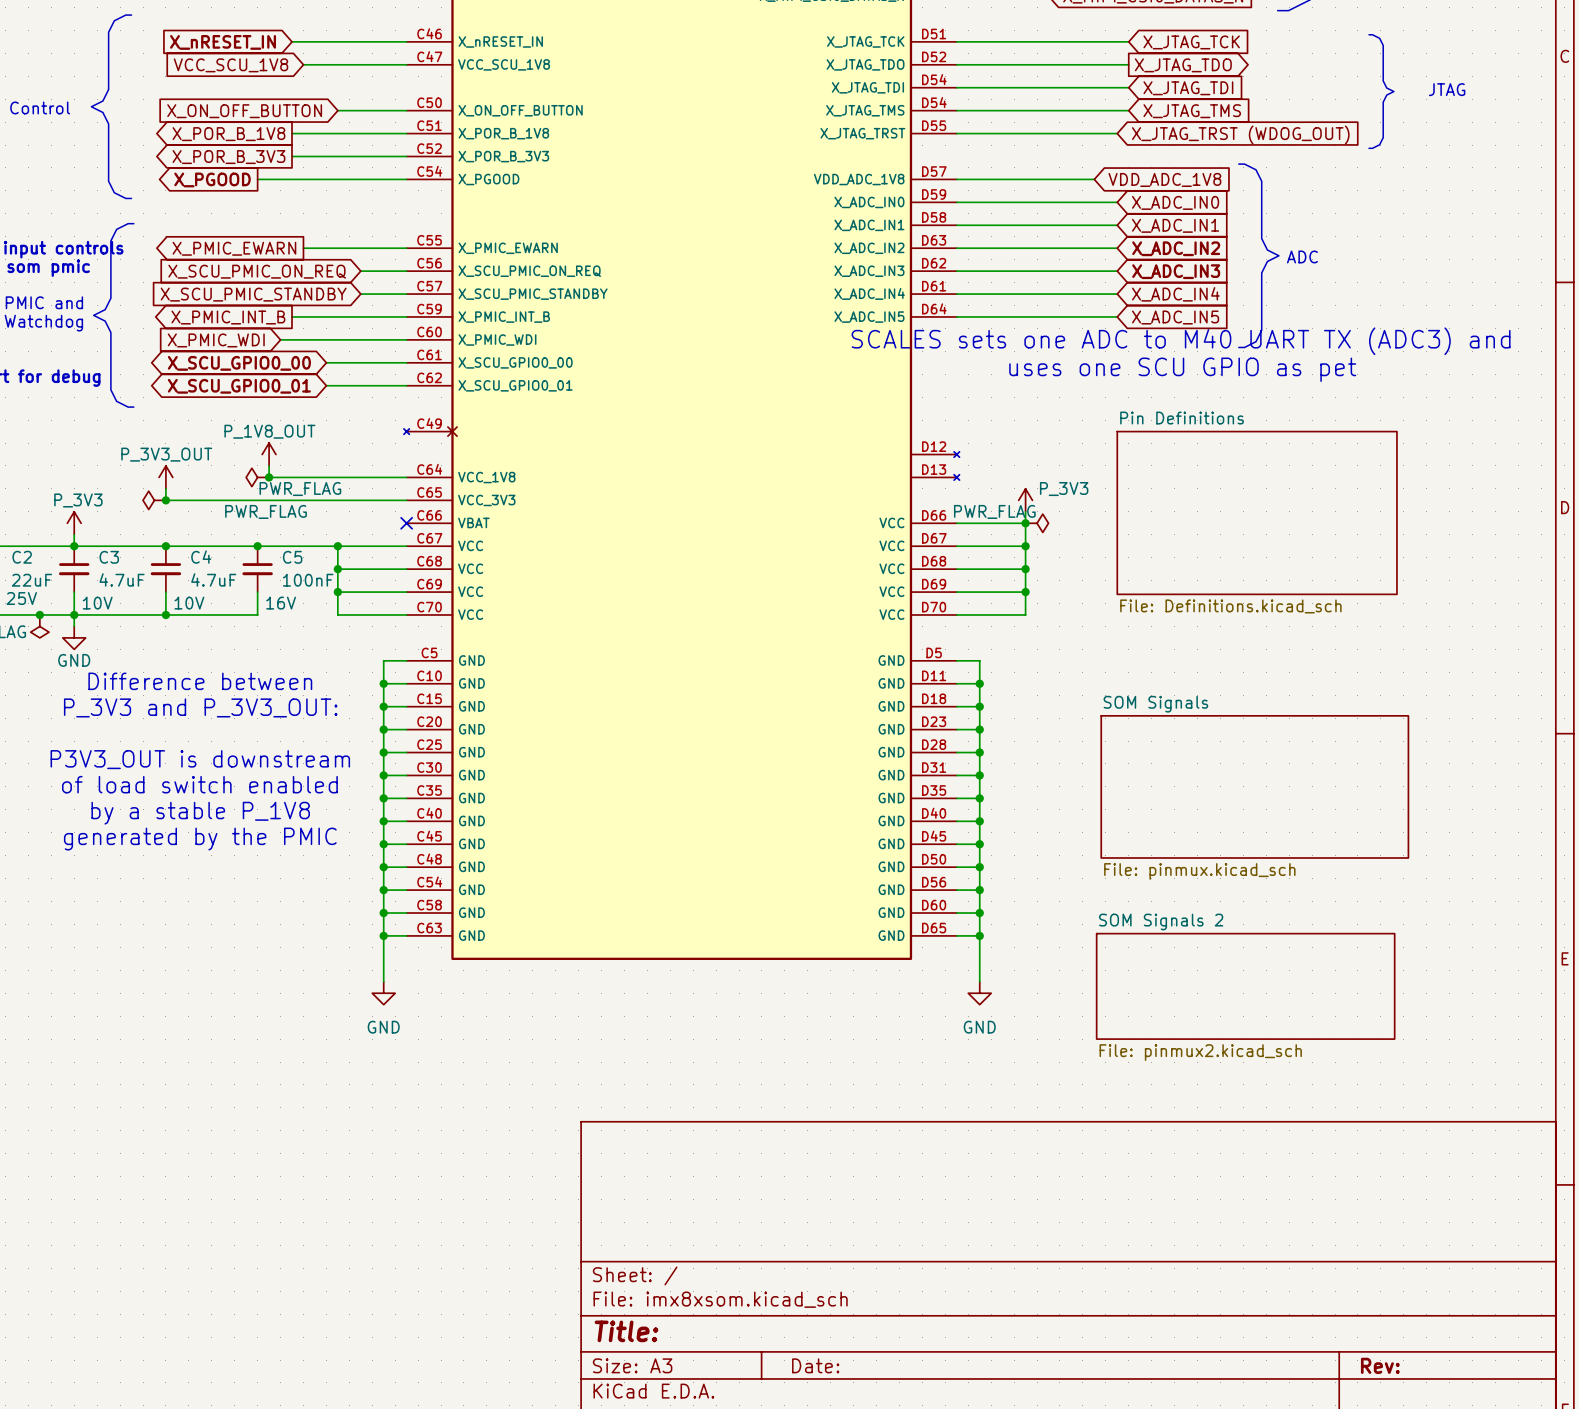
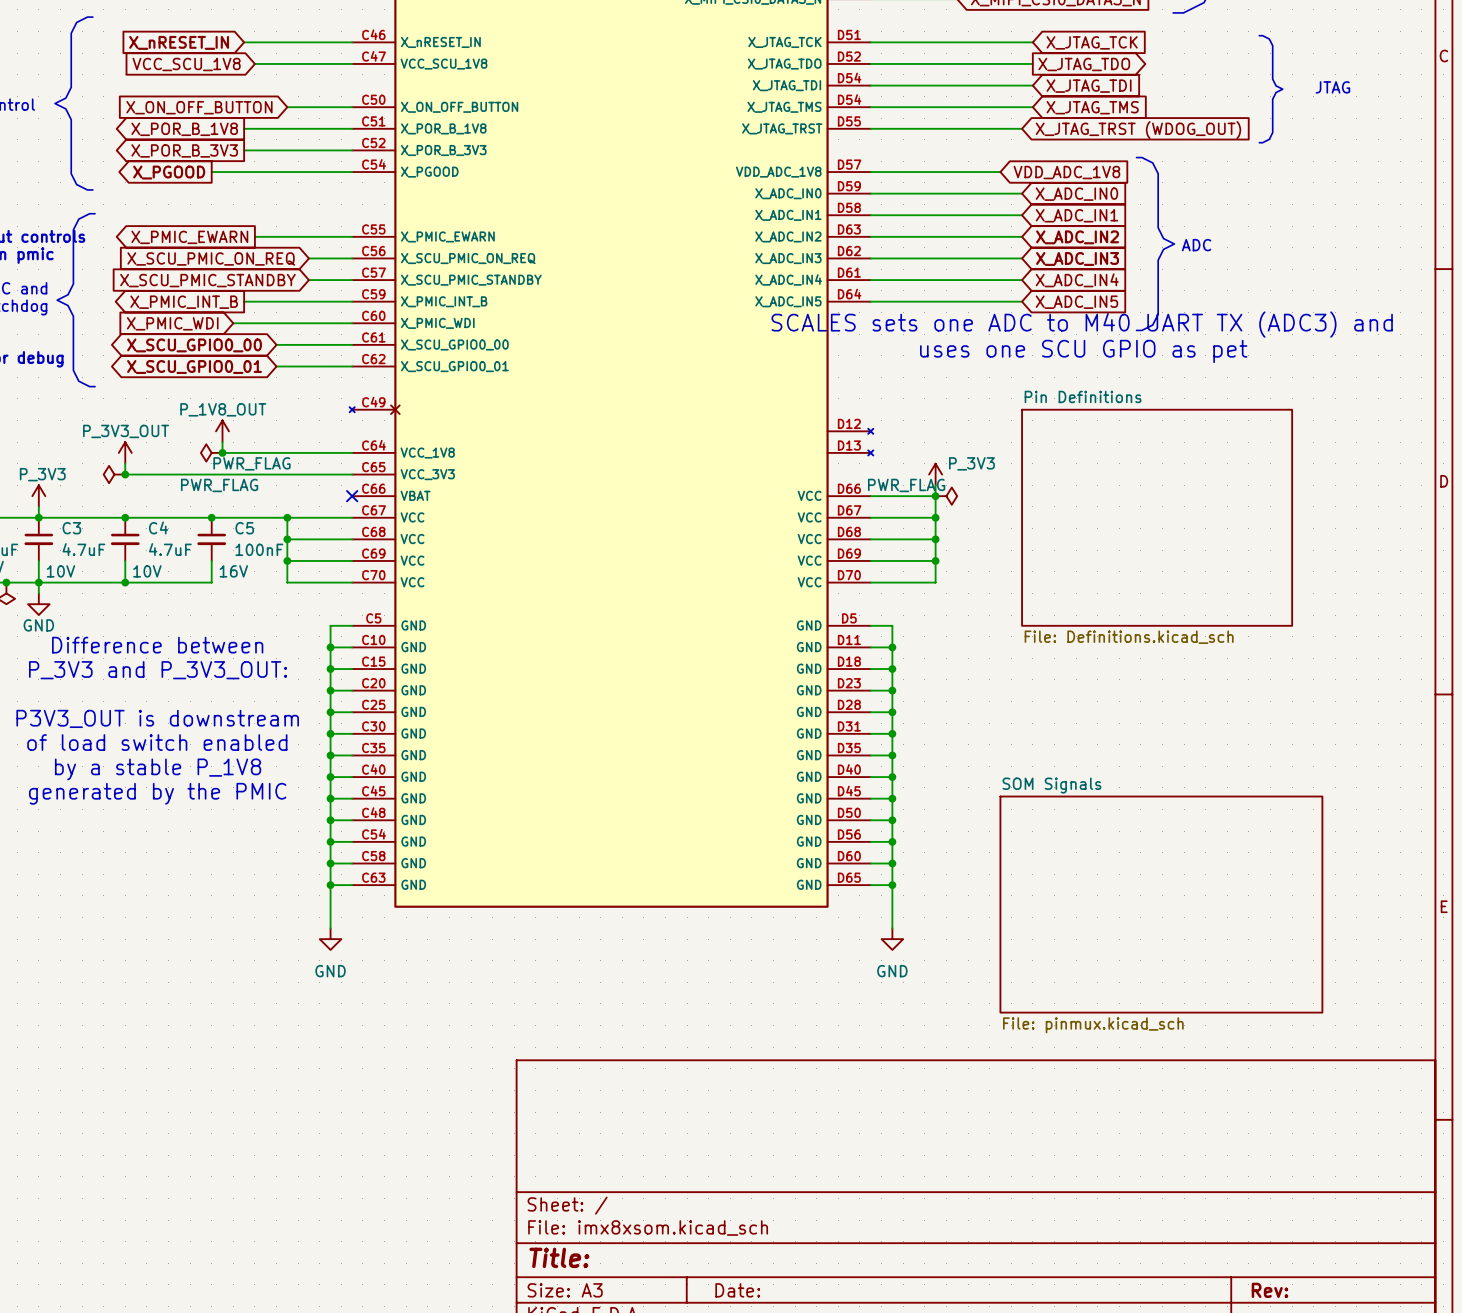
sheet Pin Definitions: File: Definitions.kicad_sch (1257, 512) -> none
sheet Pin Definitions: none -> File: Definitions.kicad_sch (1157, 517)
sheet SOM Signals: File: pinmux.kicad_sch (1254, 786) -> none
sheet SOM Signals: none -> File: pinmux.kicad_sch (1161, 904)
sheet SOM Signals 2: File: pinmux2.kicad_sch (1245, 986) -> none

